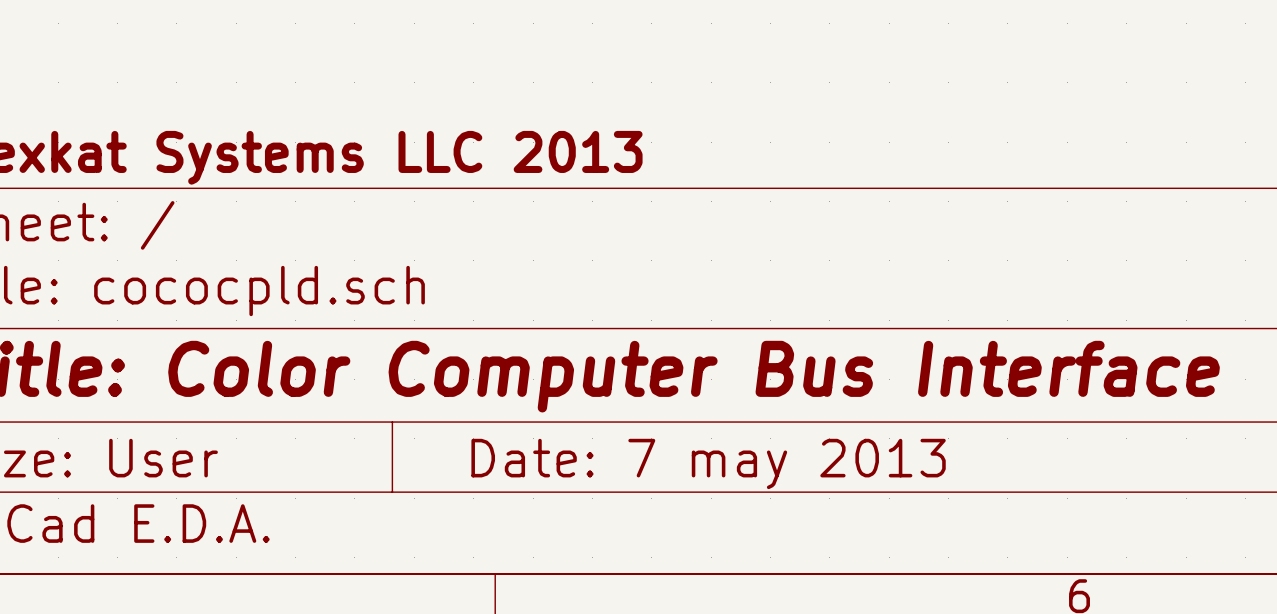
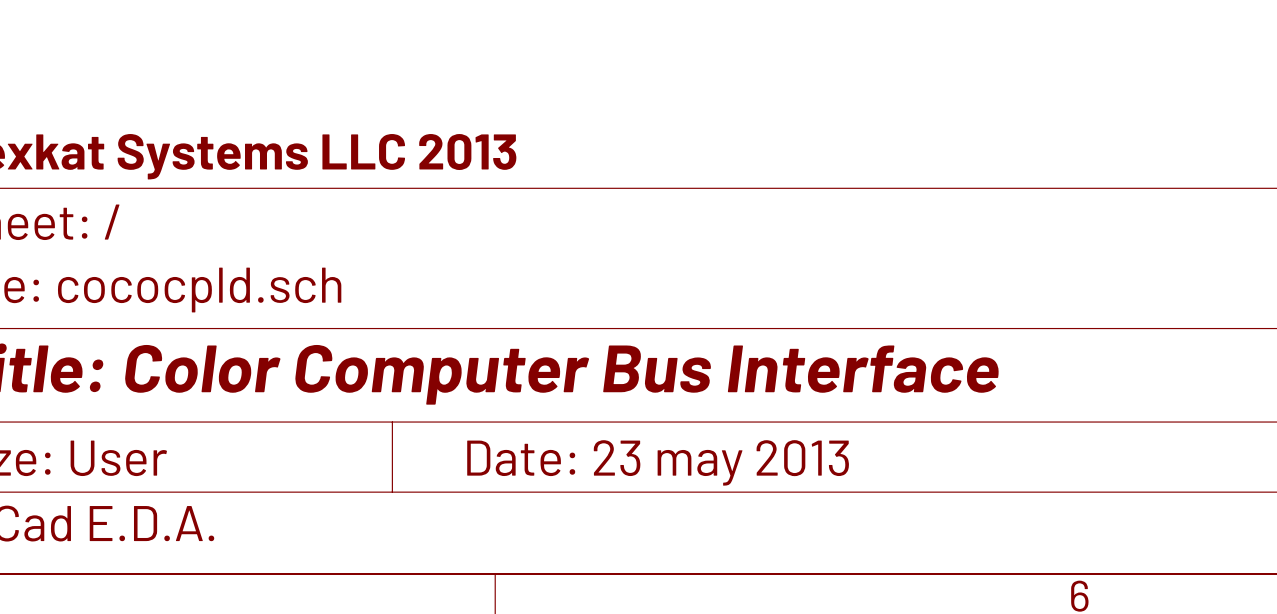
title block: Date: 7 may 2013 (708, 463) -> Date: 23 may 2013 (658, 462)

